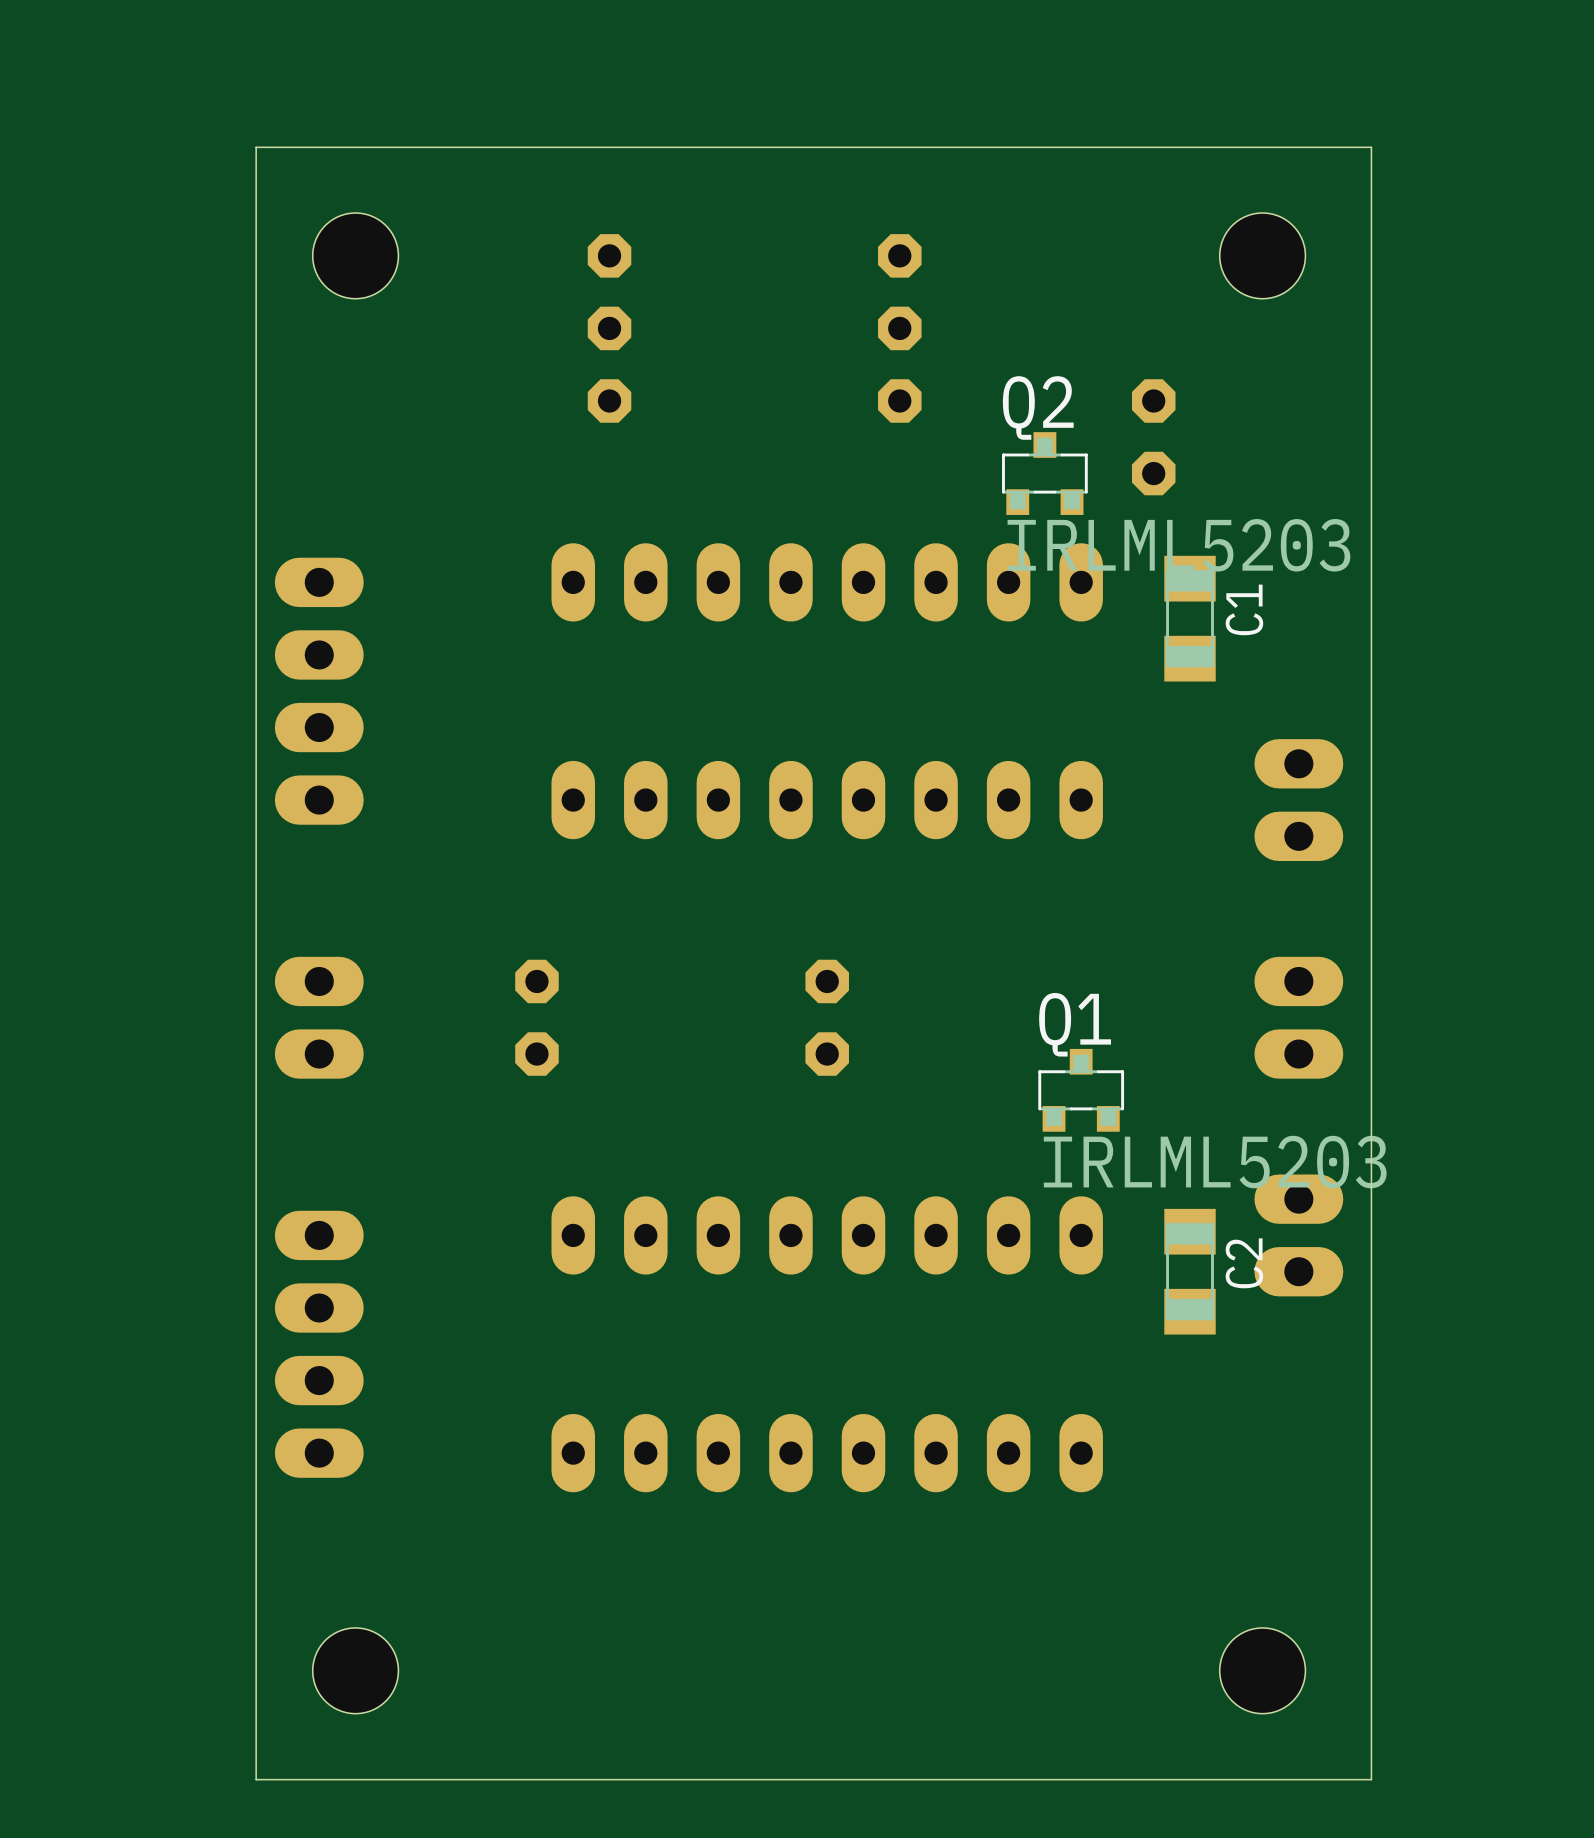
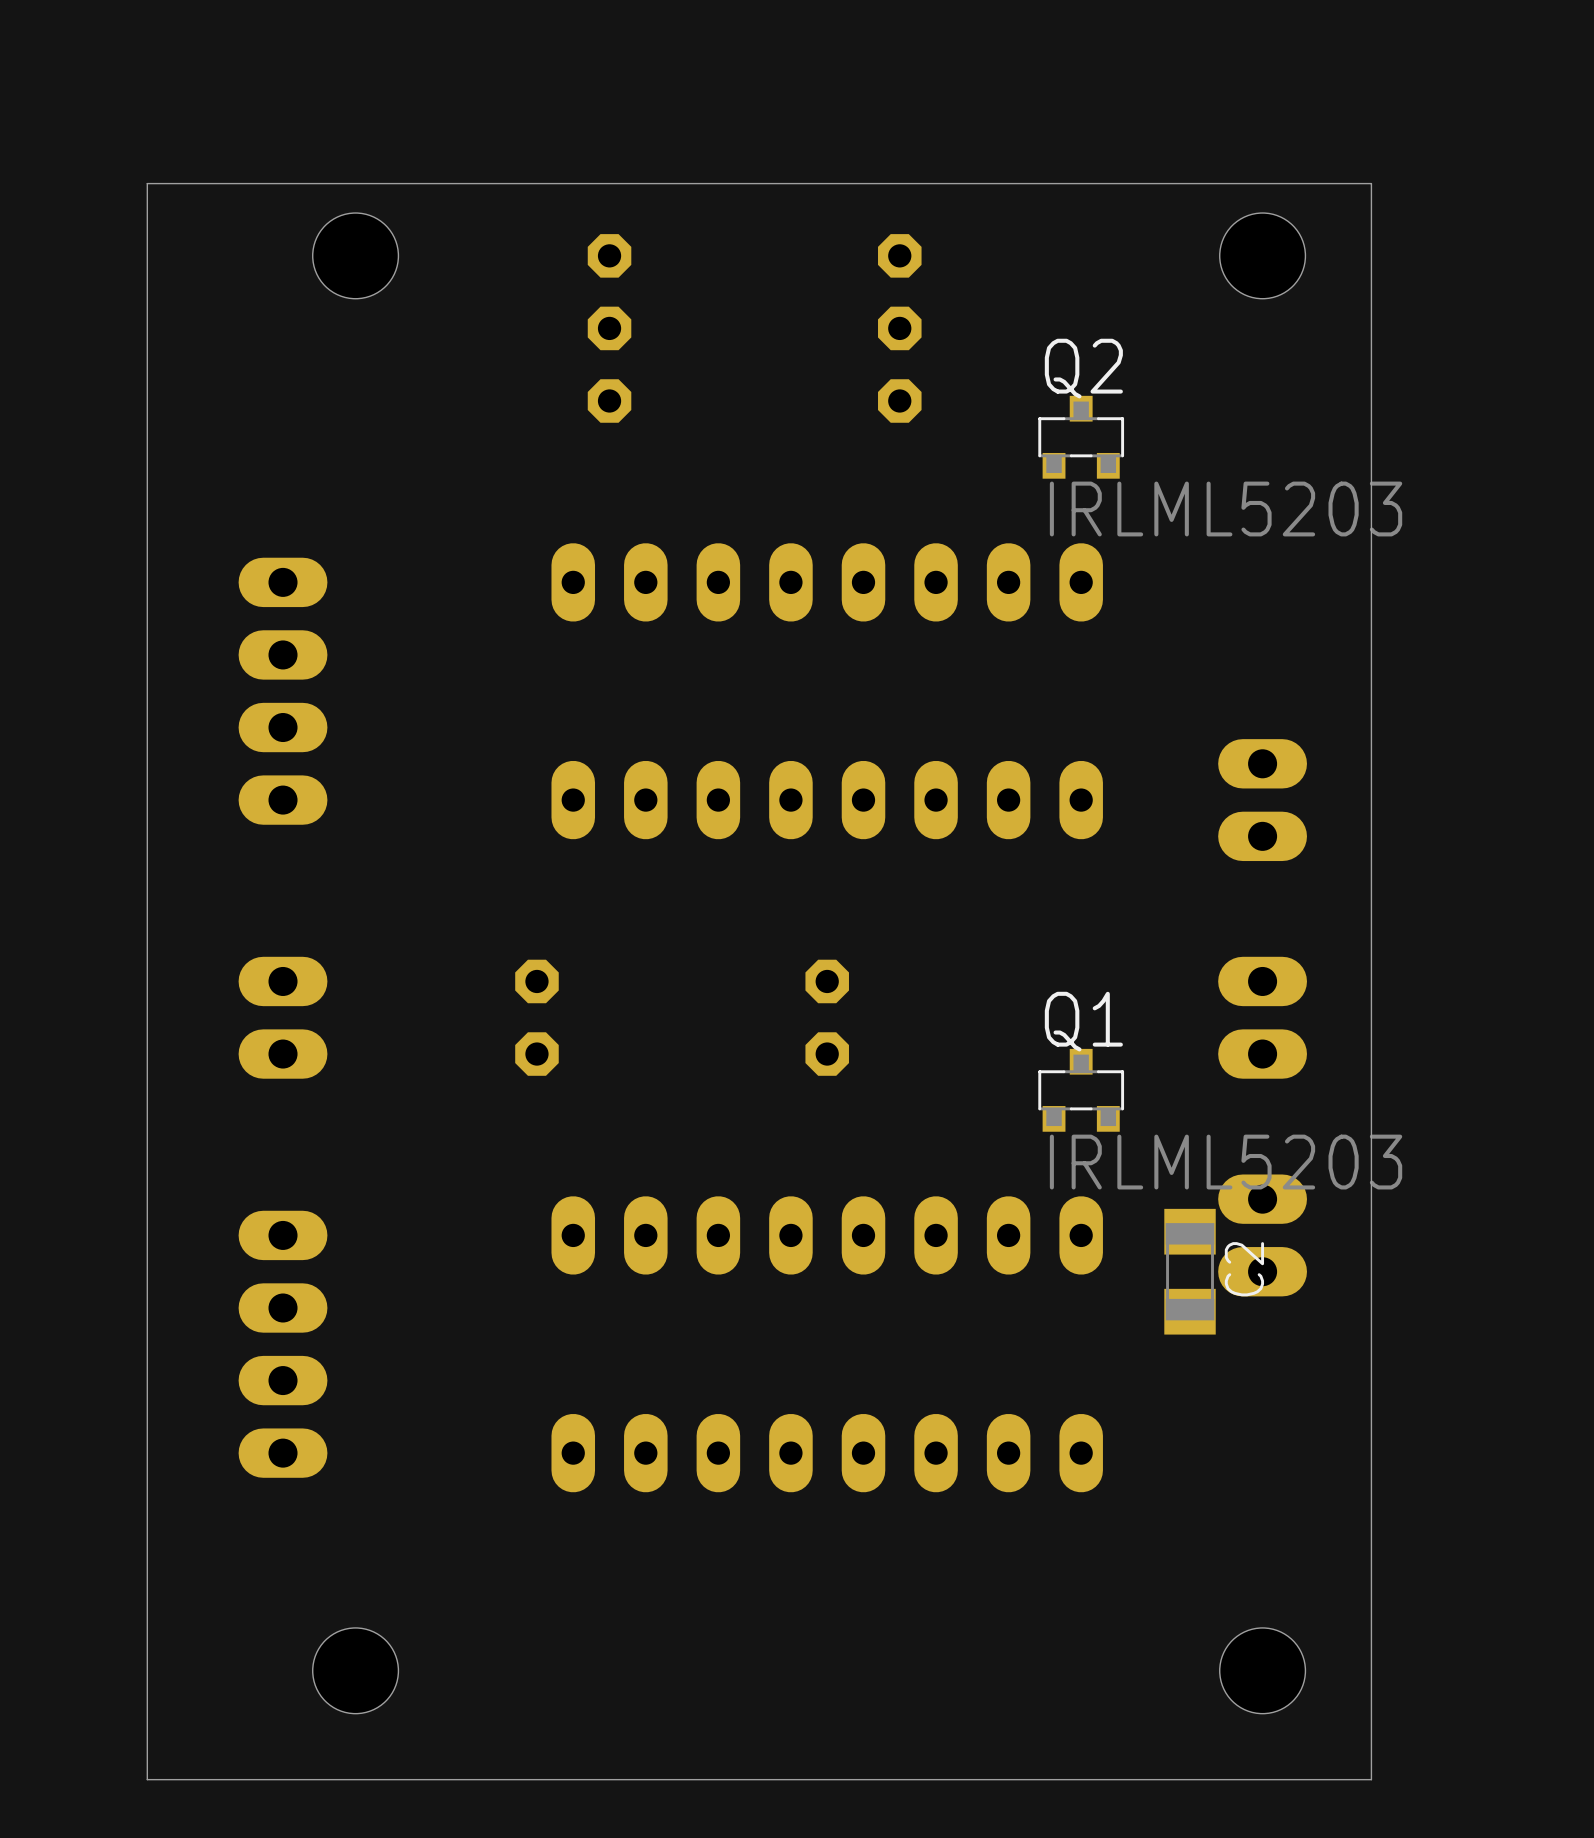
board edge: (1371, 183) (1371, 147) (256, 147) (256, 1779) -> (1371, 183) (147, 183) (147, 1779) (256, 1779)
part: (1153, 437) -> none
Q2 position: (1044, 473) -> (1081, 437)
C1: (1190, 618) -> none
part position: (319, 691) -> (283, 691)
part position: (1298, 800) -> (1262, 800)
part position: (319, 1017) -> (283, 1017)
part position: (1298, 1017) -> (1262, 1017)
part position: (1298, 1235) -> (1262, 1235)
part position: (319, 1344) -> (283, 1344)

